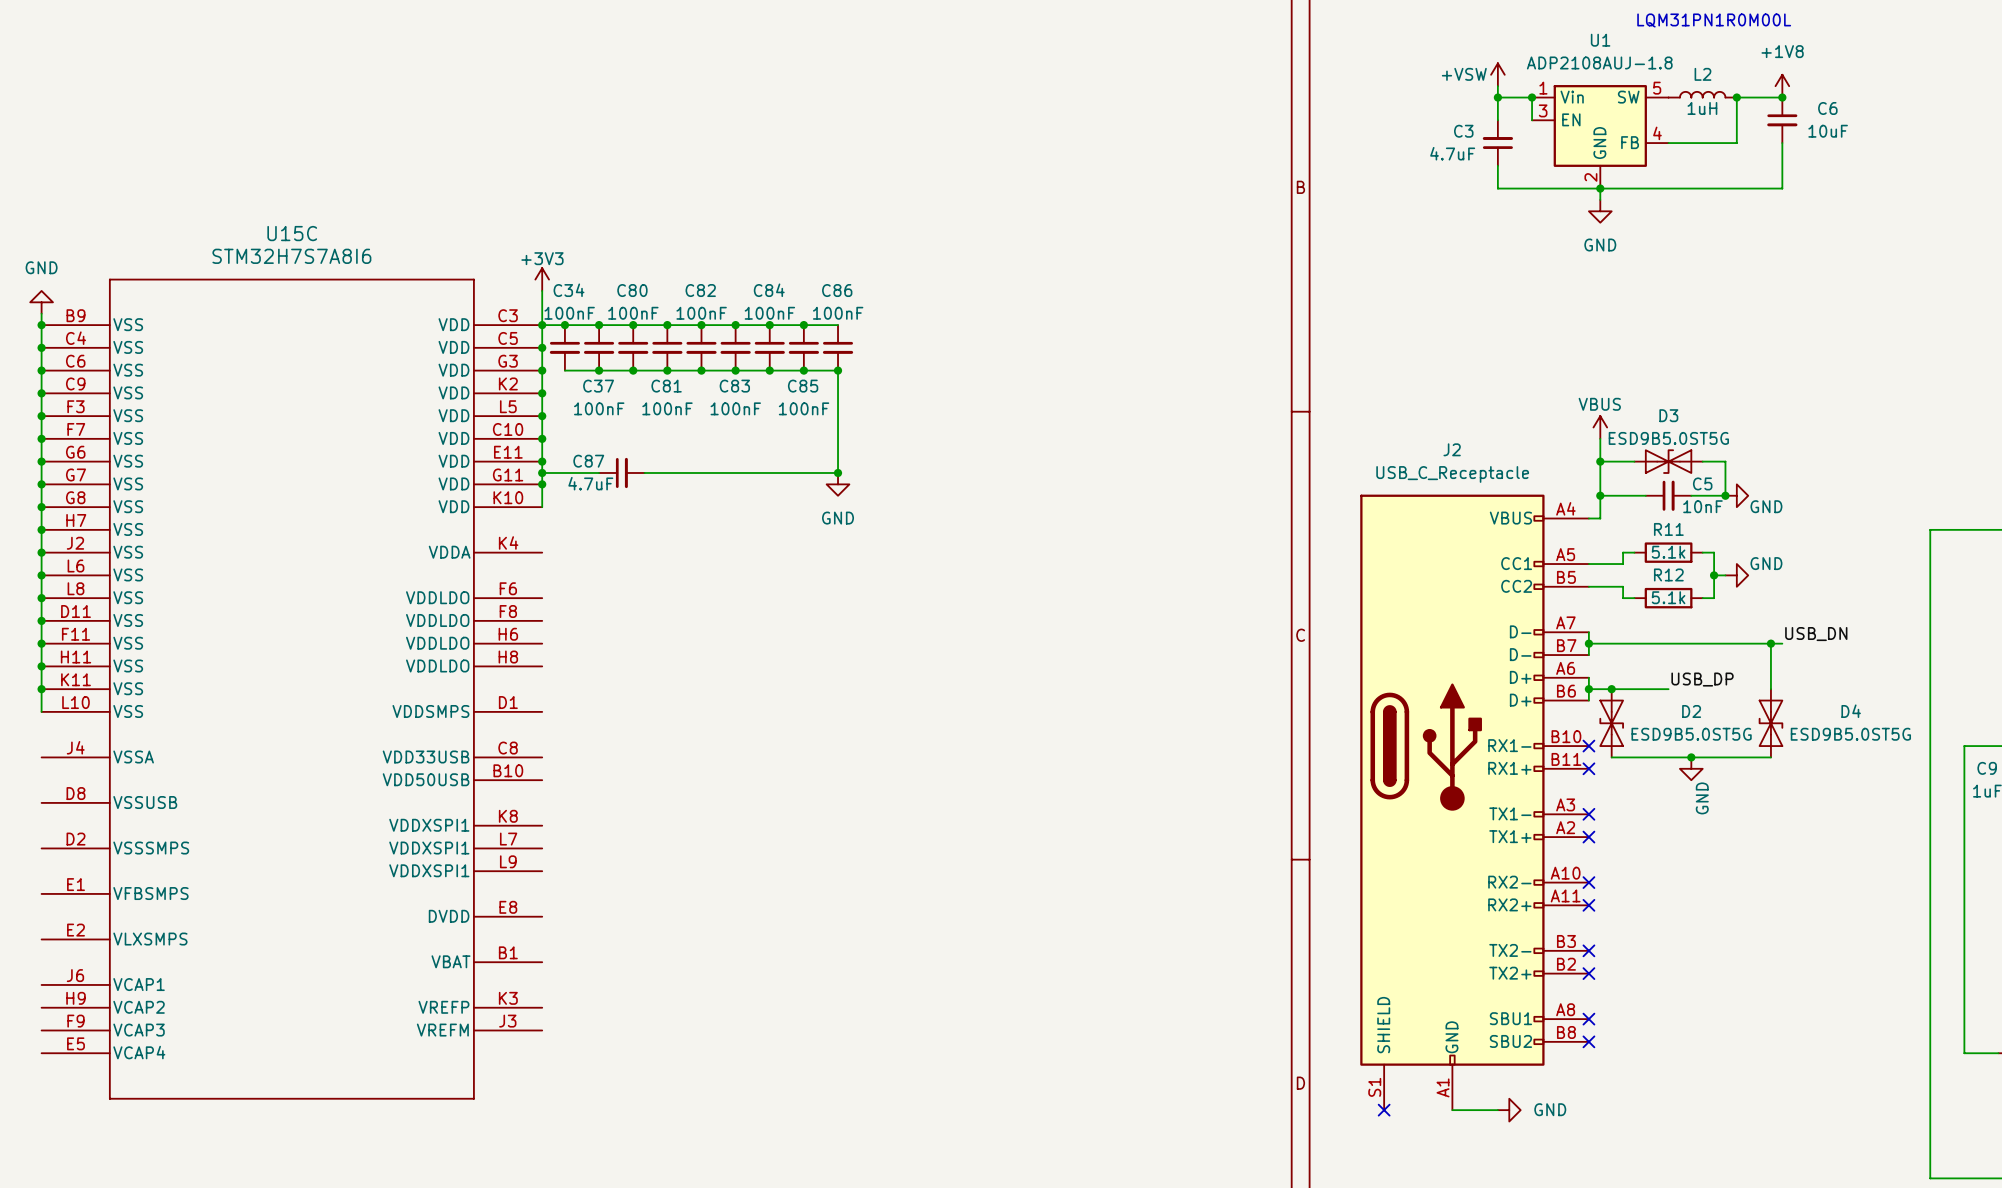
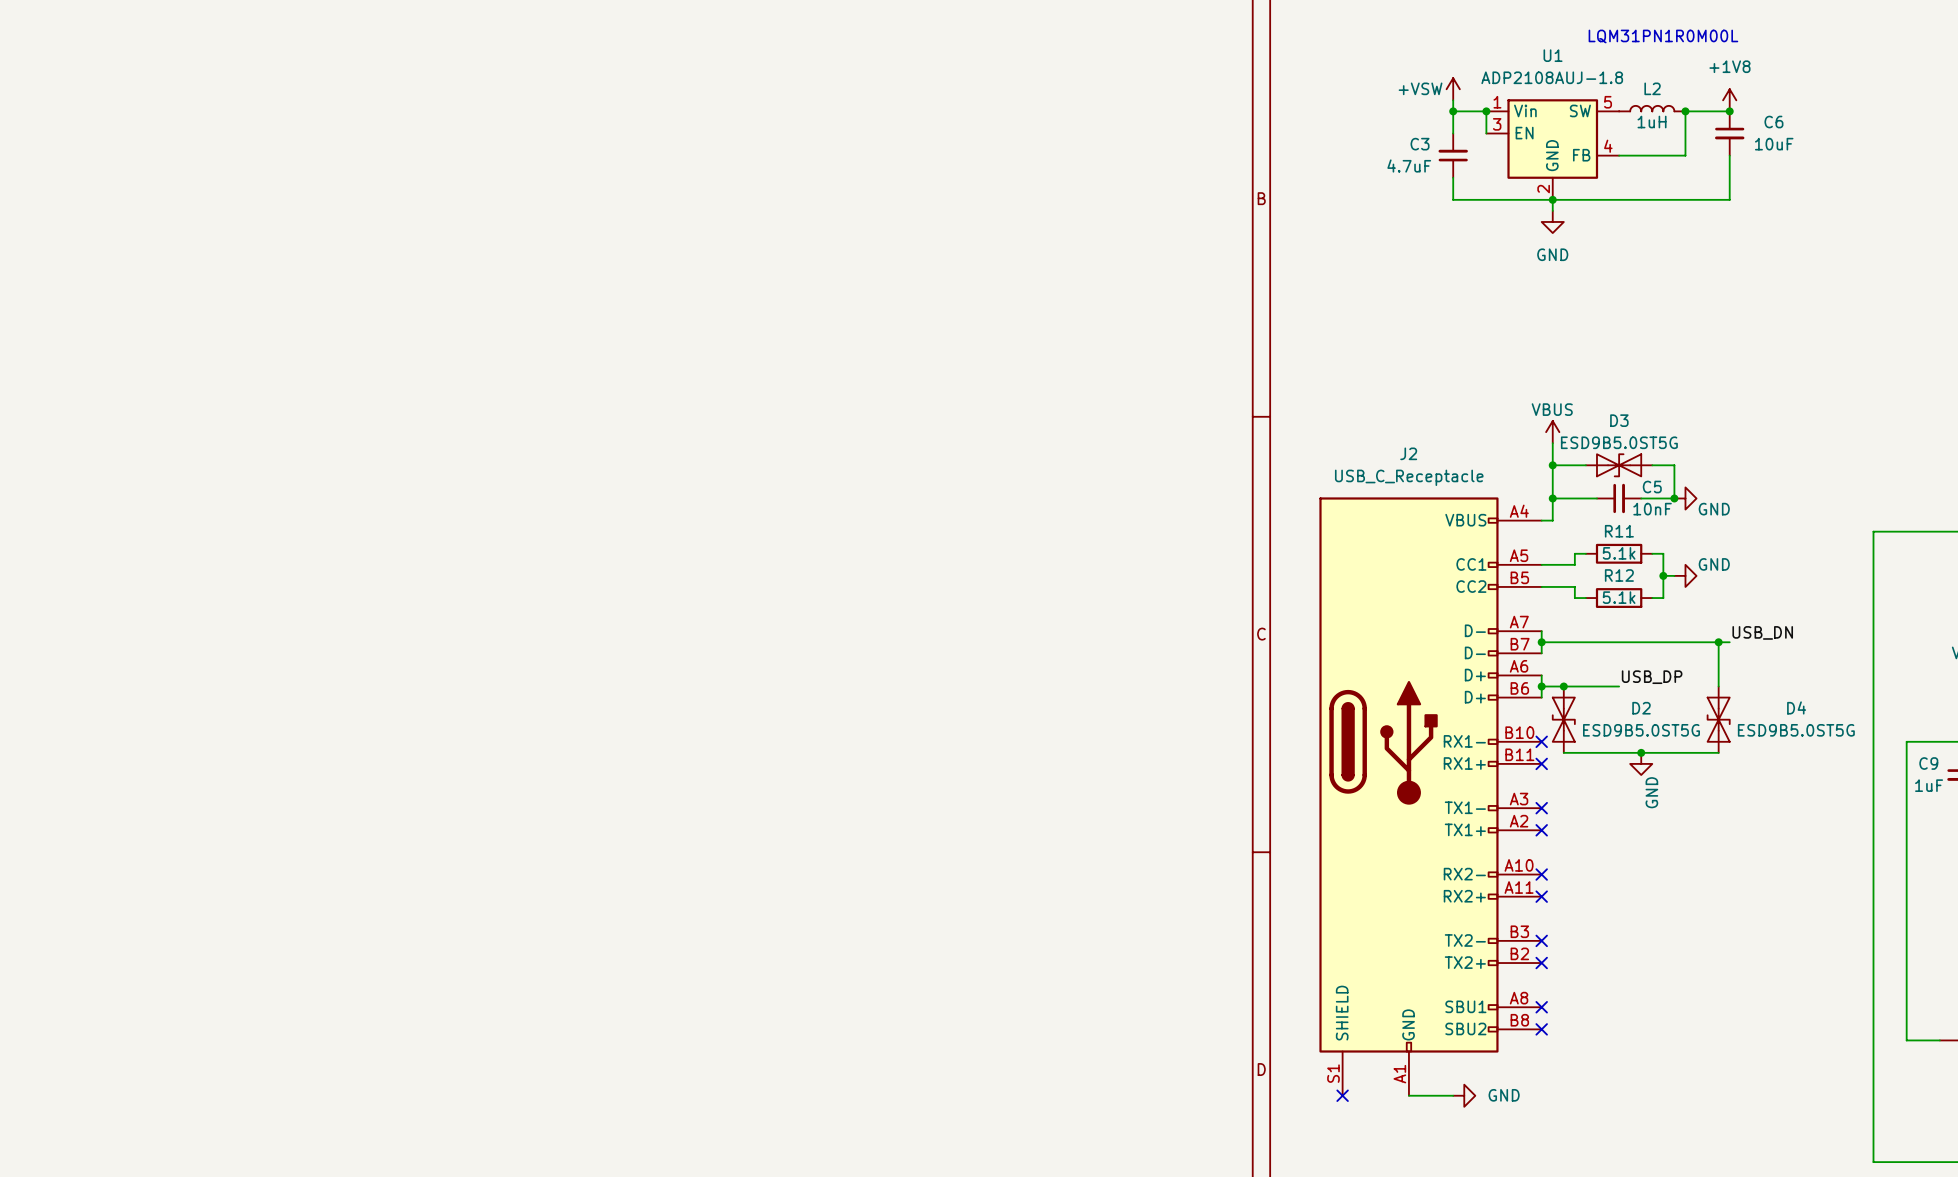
power symbol: +3V3 (542, 279) -> none
wire: (542, 290) (542, 507) -> none
power symbol: GND (41, 302) -> none
wire: (41, 313) (41, 711) -> none
junction: (41, 325) -> none
wire: (542, 325) (838, 325) -> none
junction: (542, 325) -> none
junction: (564, 325) -> none
junction: (599, 325) -> none
junction: (633, 325) -> none
junction: (667, 325) -> none
junction: (701, 325) -> none
junction: (735, 325) -> none
junction: (769, 325) -> none
junction: (803, 325) -> none
junction: (41, 347) -> none
junction: (542, 347) -> none
C34: 100nF (564, 347) -> none
C37: 100nF (599, 347) -> none
C80: 100nF (633, 347) -> none
C81: 100nF (667, 347) -> none
C82: 100nF (701, 347) -> none
C83: 100nF (735, 347) -> none
C84: 100nF (769, 347) -> none
C85: 100nF (803, 347) -> none
C86: 100nF (838, 347) -> none
junction: (41, 370) -> none
junction: (542, 370) -> none
wire: (564, 370) (838, 370) (838, 472) (644, 472) -> none
junction: (599, 370) -> none
junction: (633, 370) -> none
junction: (667, 370) -> none
junction: (701, 370) -> none
junction: (735, 370) -> none
junction: (769, 370) -> none
junction: (803, 370) -> none
junction: (838, 370) -> none
junction: (41, 393) -> none
junction: (542, 393) -> none
junction: (41, 416) -> none
junction: (542, 416) -> none
junction: (41, 438) -> none
junction: (542, 438) -> none
junction: (41, 461) -> none
junction: (542, 461) -> none
wire: (542, 472) (599, 472) -> none
junction: (542, 472) -> none
C87: 4.7uF (621, 472) -> none
junction: (838, 472) -> none
junction: (41, 484) -> none
junction: (542, 484) -> none
power symbol: GND (838, 484) -> none
junction: (41, 507) -> none
junction: (41, 529) -> none
junction: (41, 552) -> none
junction: (41, 575) -> none
junction: (41, 598) -> none
junction: (41, 620) -> none
junction: (41, 643) -> none
junction: (41, 666) -> none
junction: (41, 689) -> none
U15C: STM32H7S7A8I6 (291, 689) -> none

